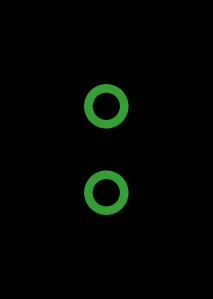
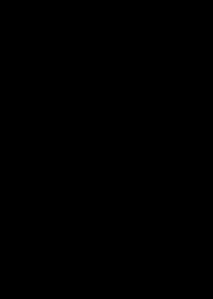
part: (106, 149) -> none

